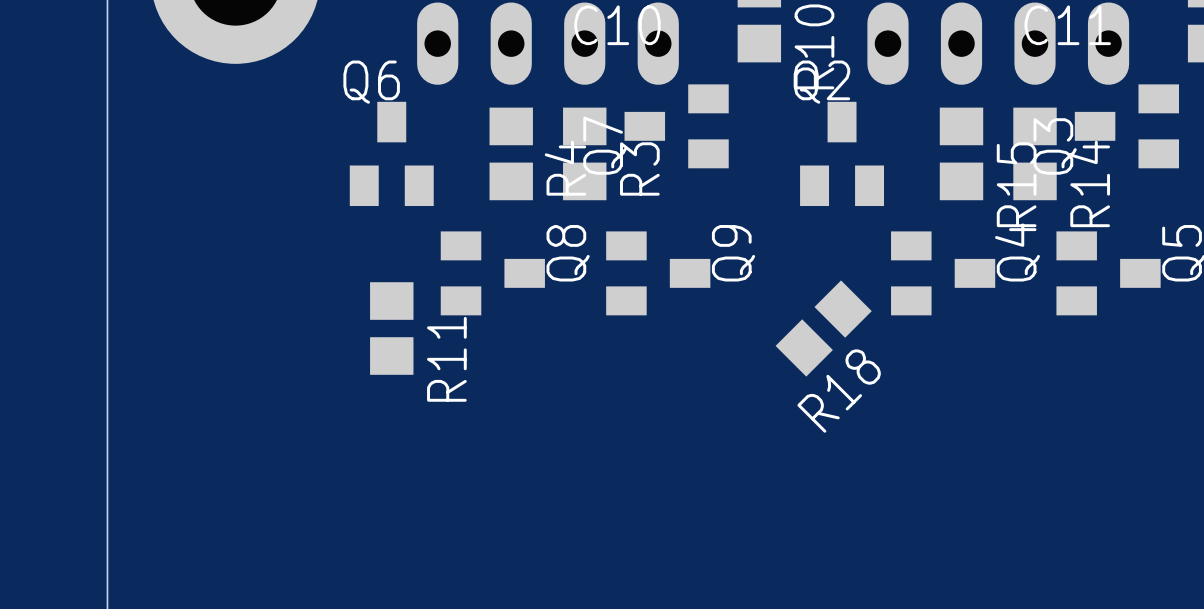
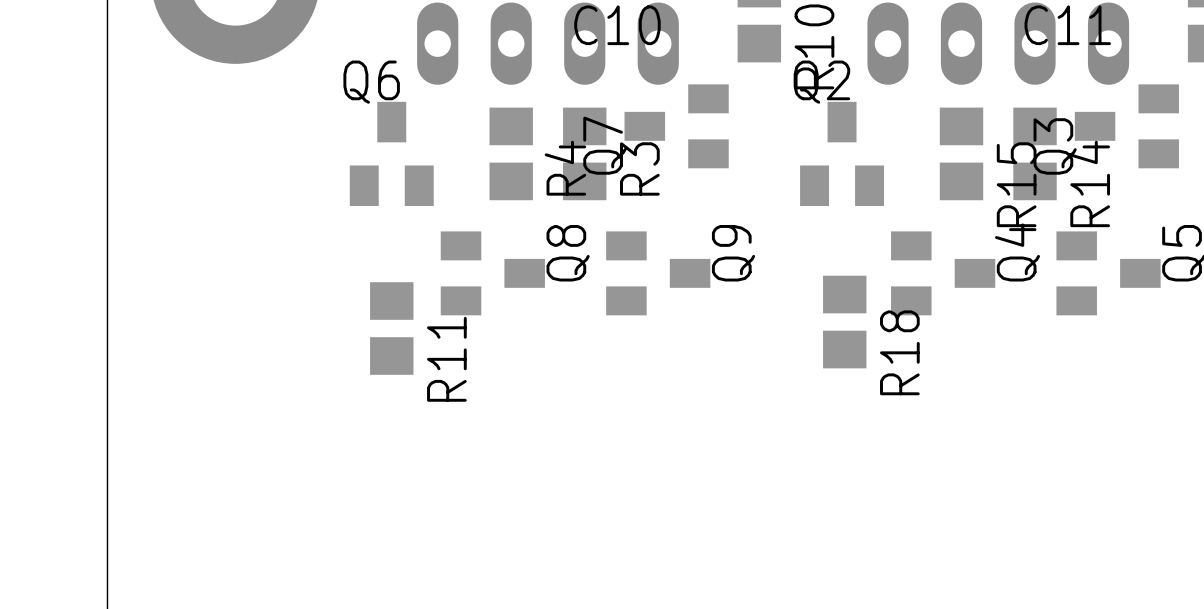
R18 rotation: 0° (823, 328) -> 45° counterclockwise (844, 322)

